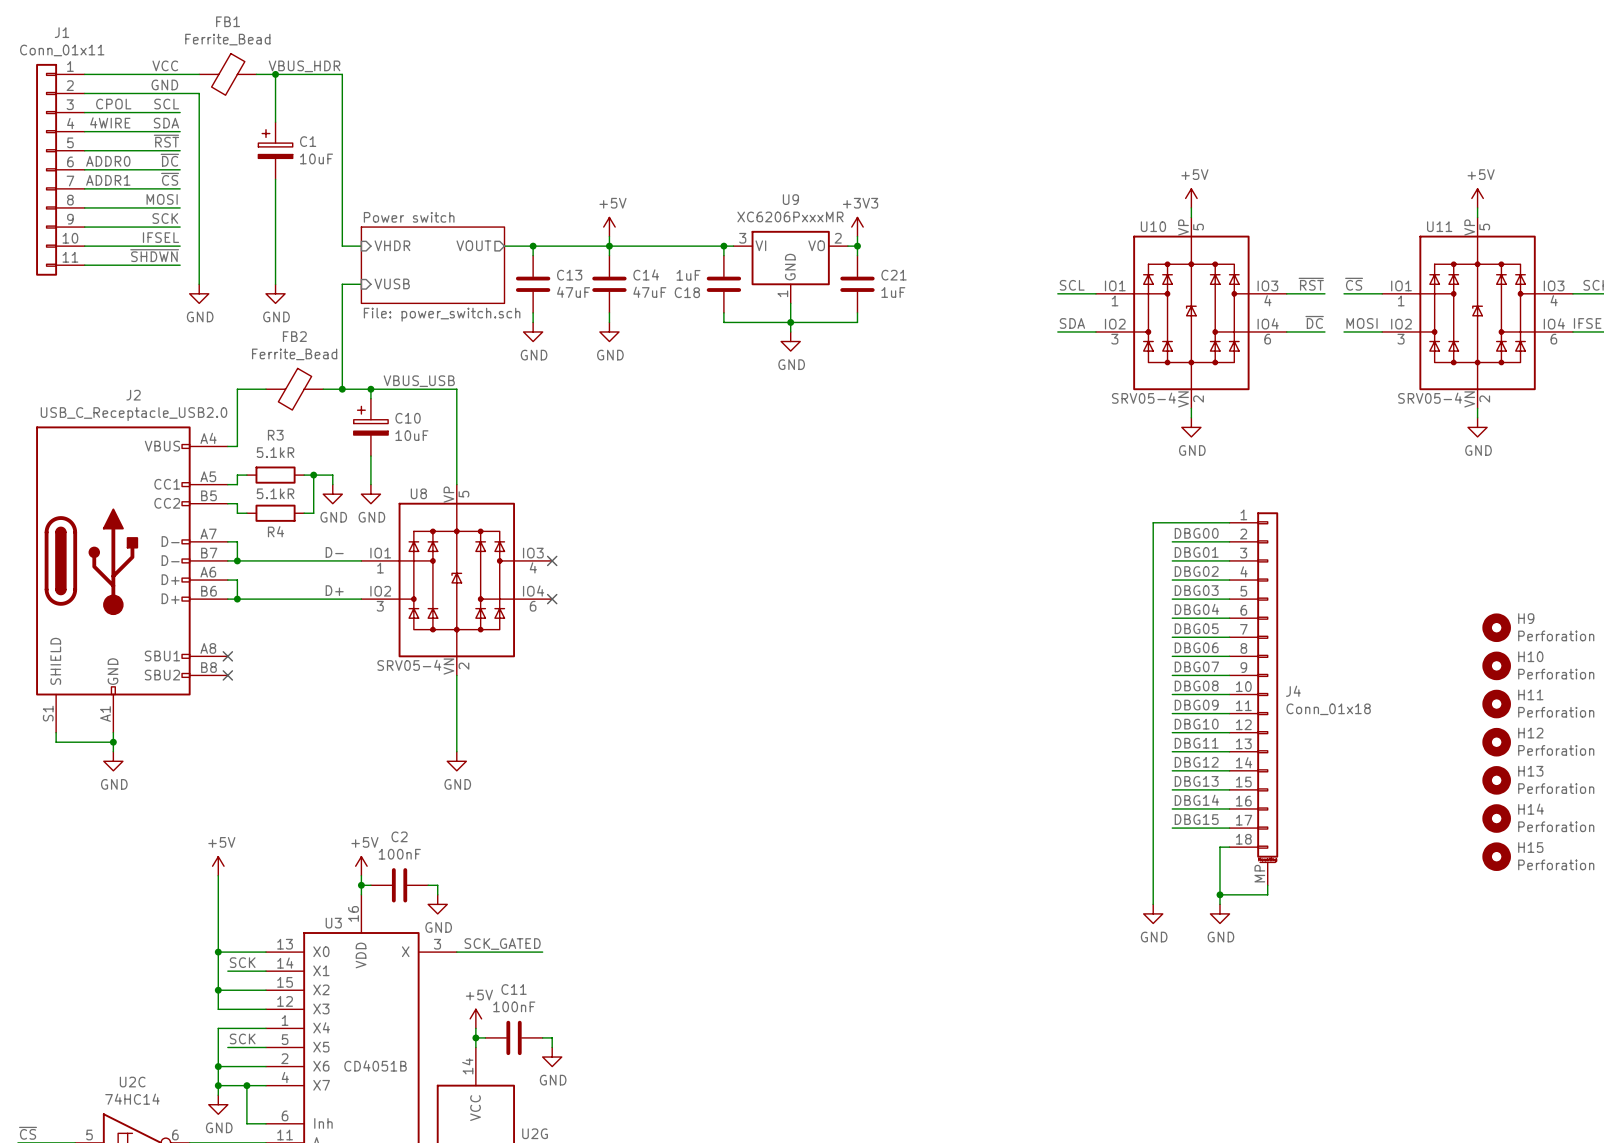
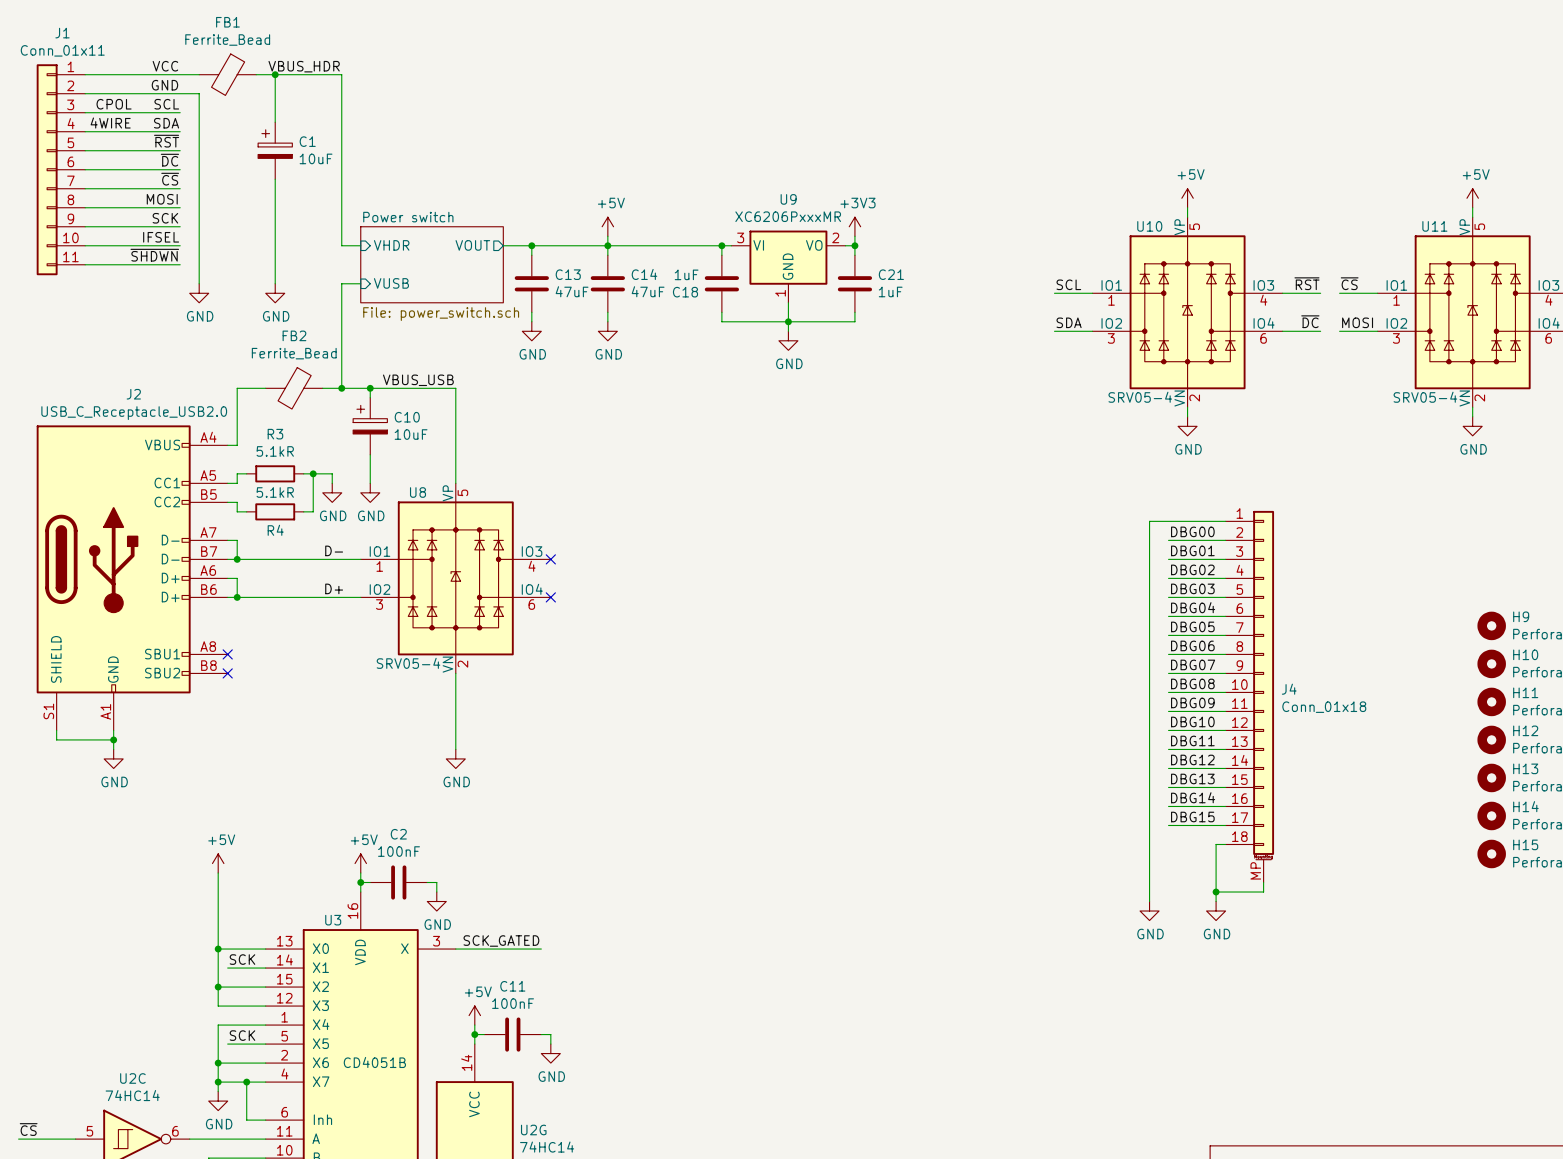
label: ADDR0 (108, 161) -> none
label: ADDR1 (108, 180) -> none

